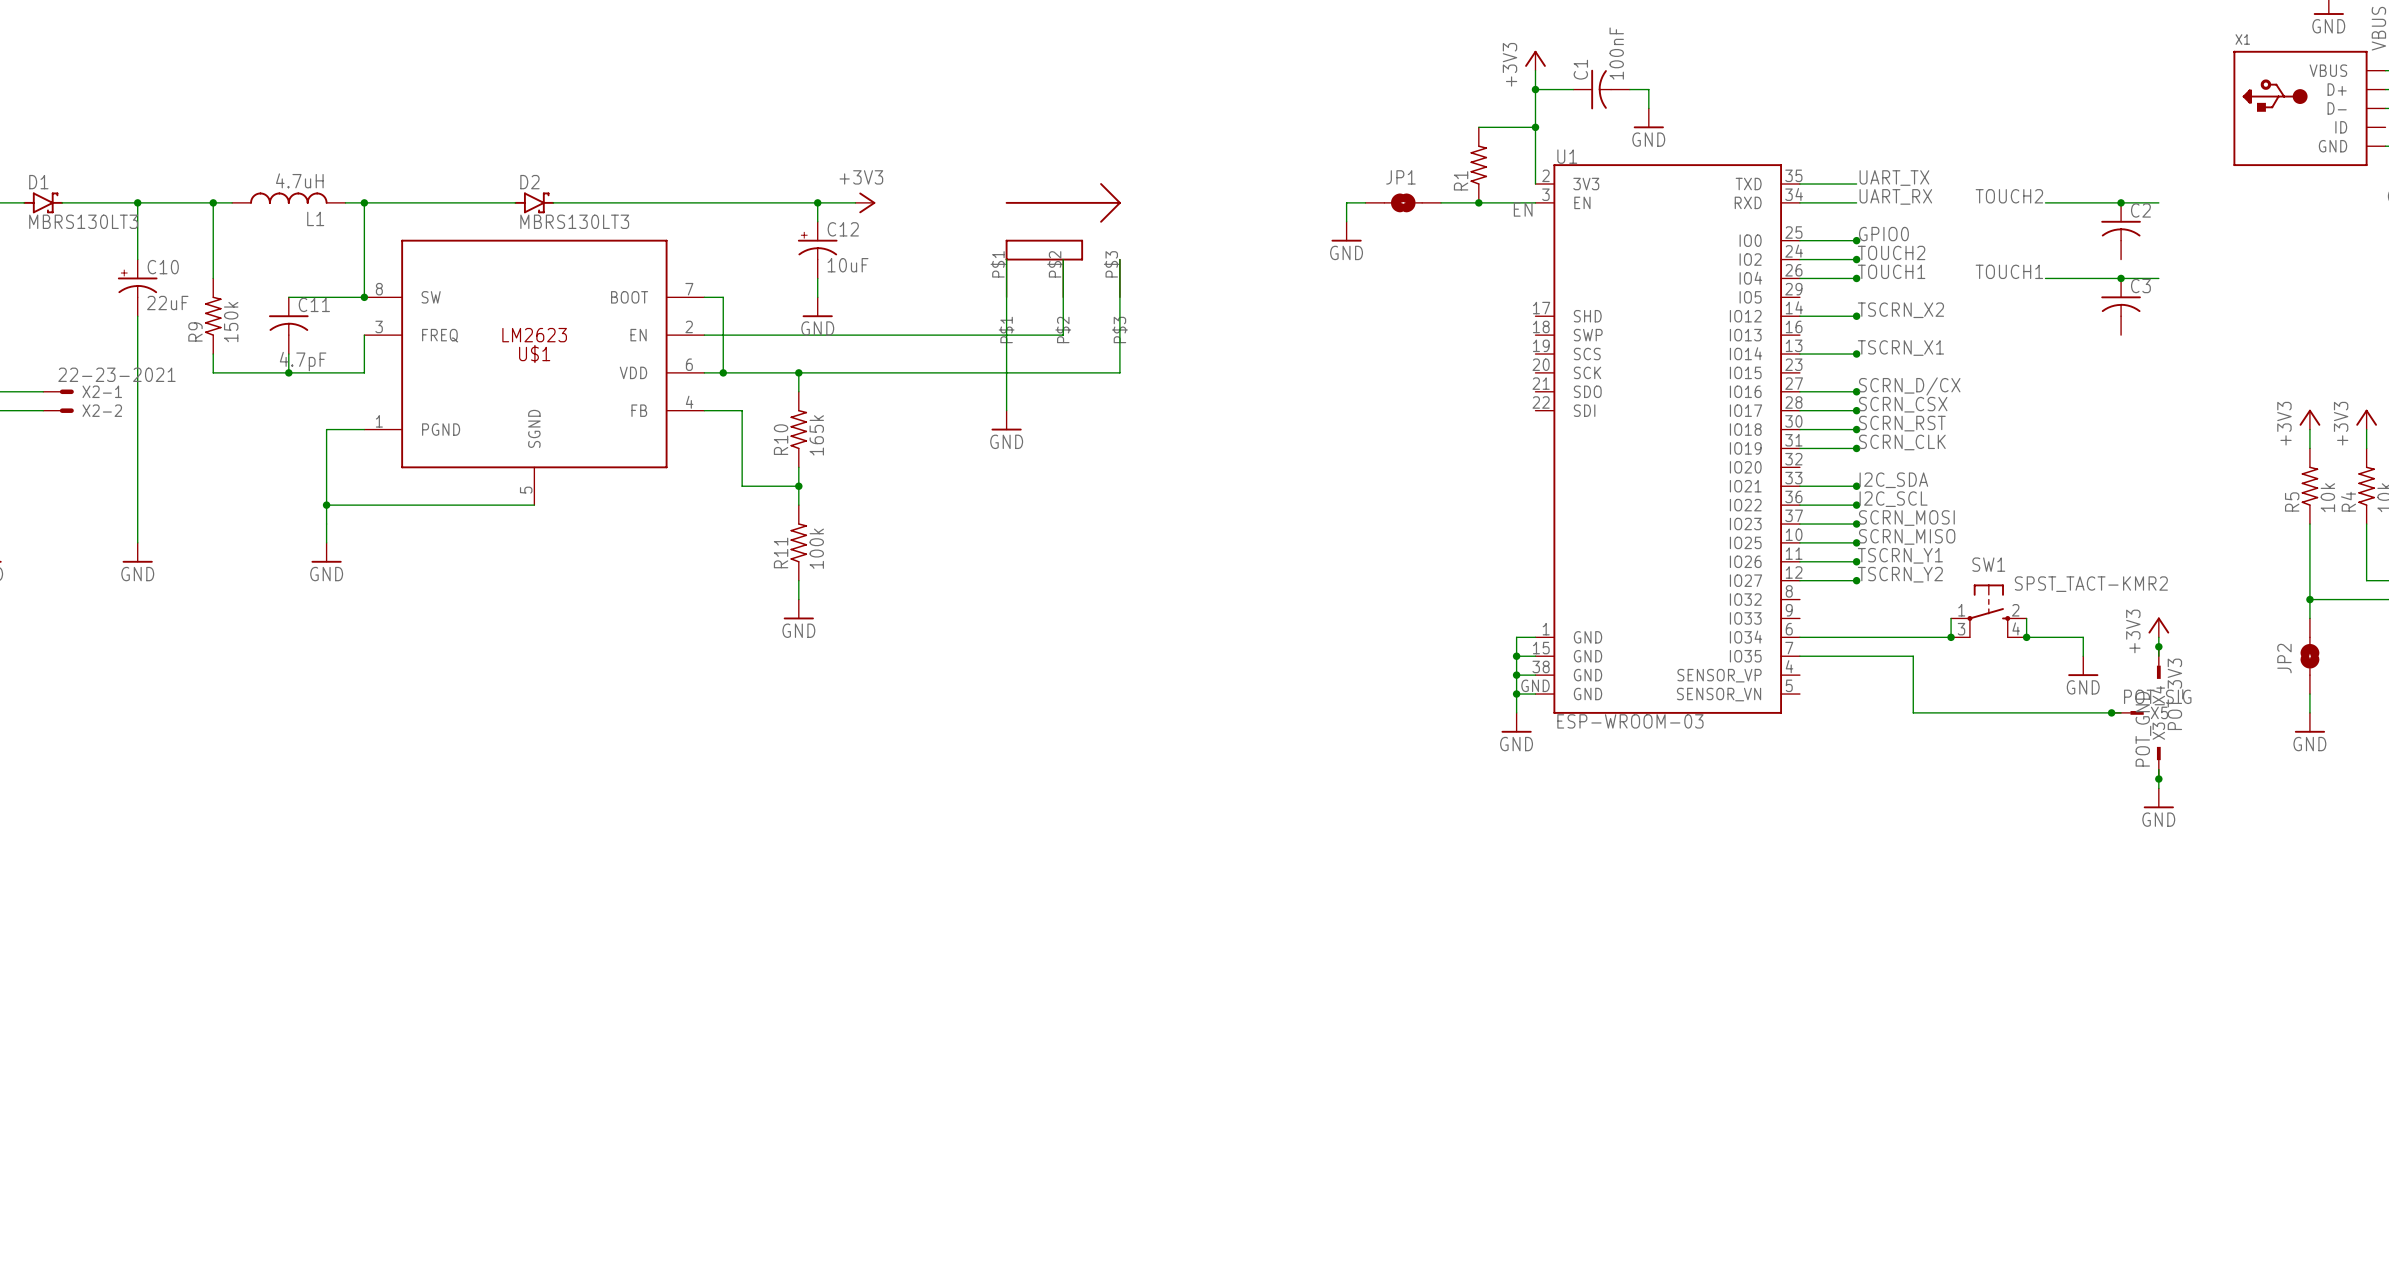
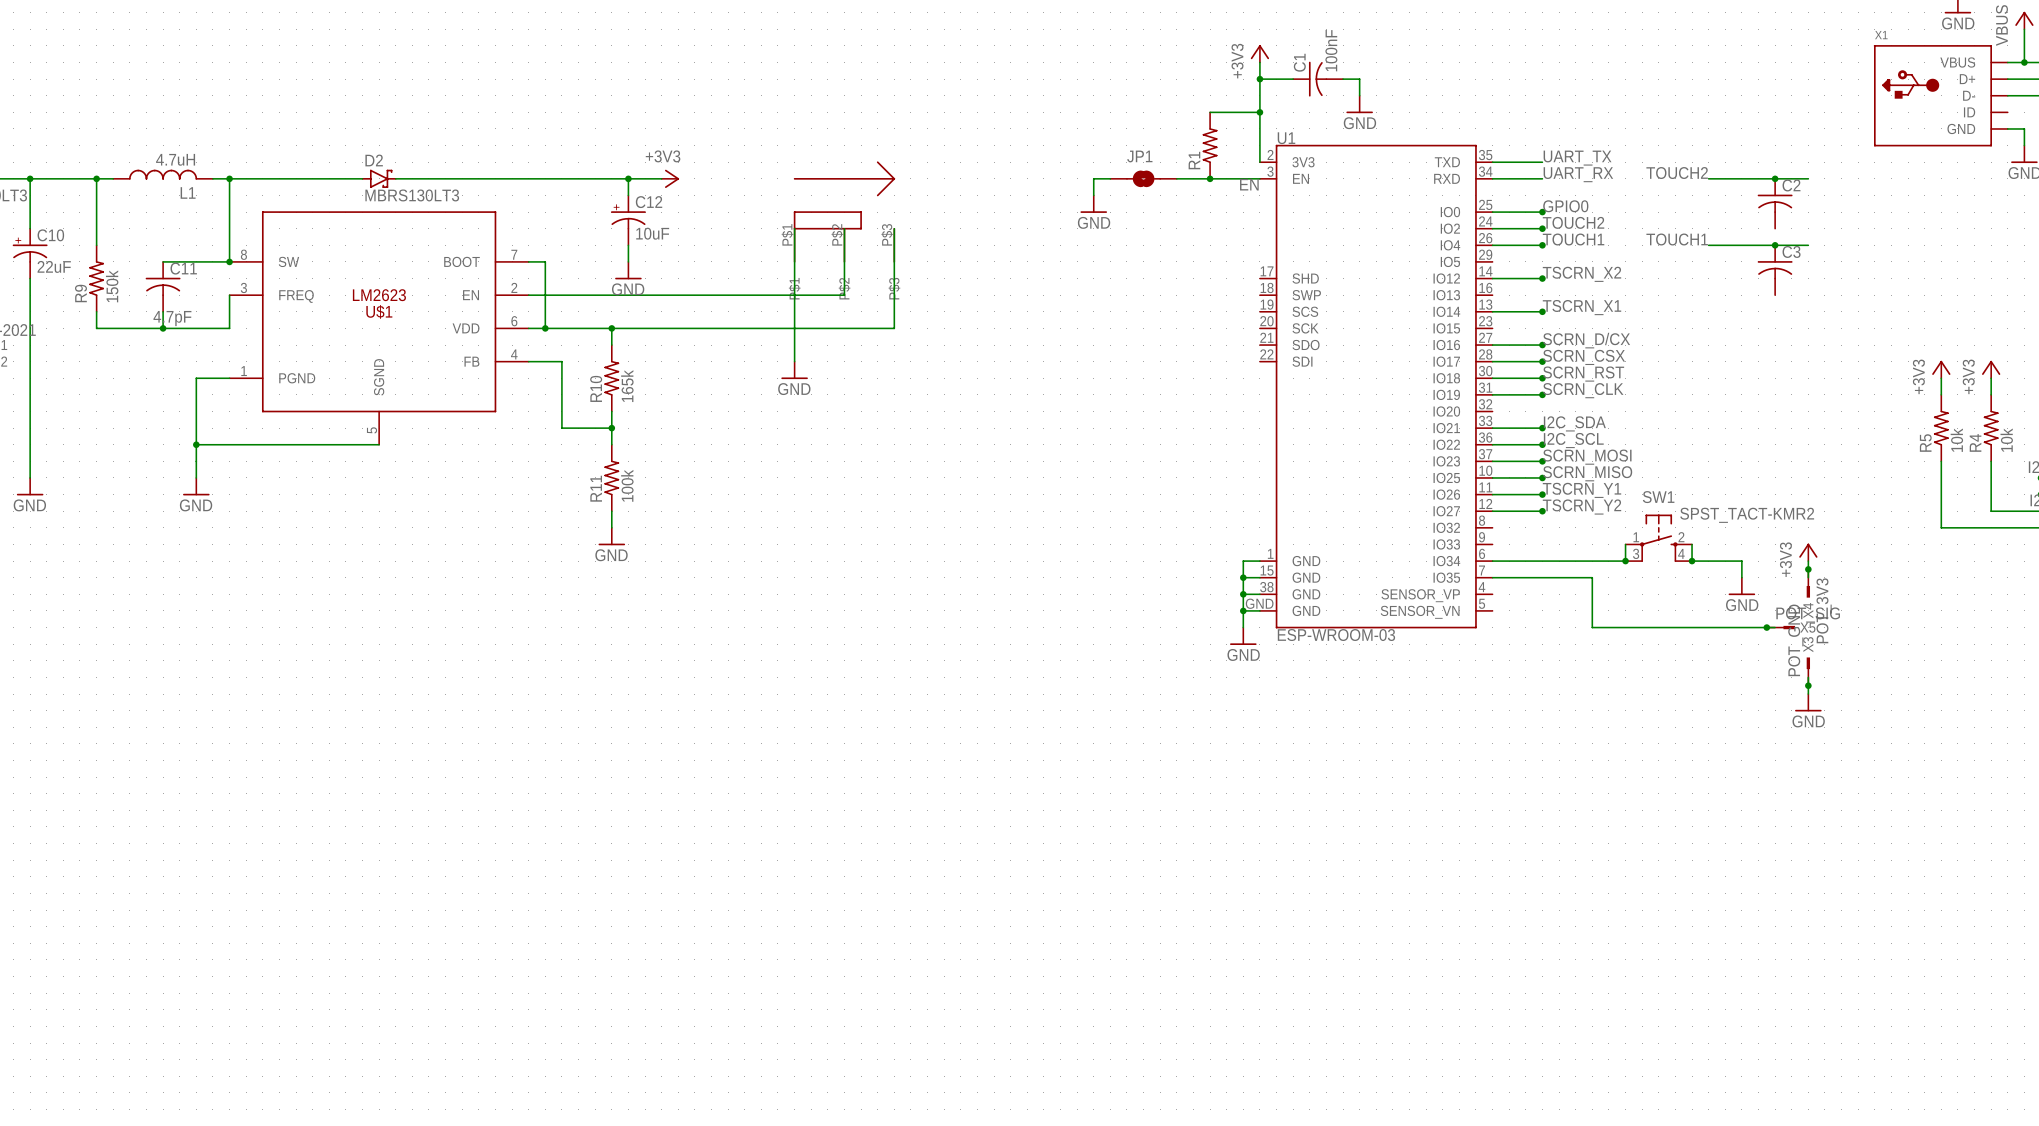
wire: (2309, 599) (2309, 618) -> none
junction: (2309, 599) -> none
JP2: (2309, 656) -> none
wire: (2309, 694) (2309, 712) -> none
power symbol: GND (2309, 722) -> none

